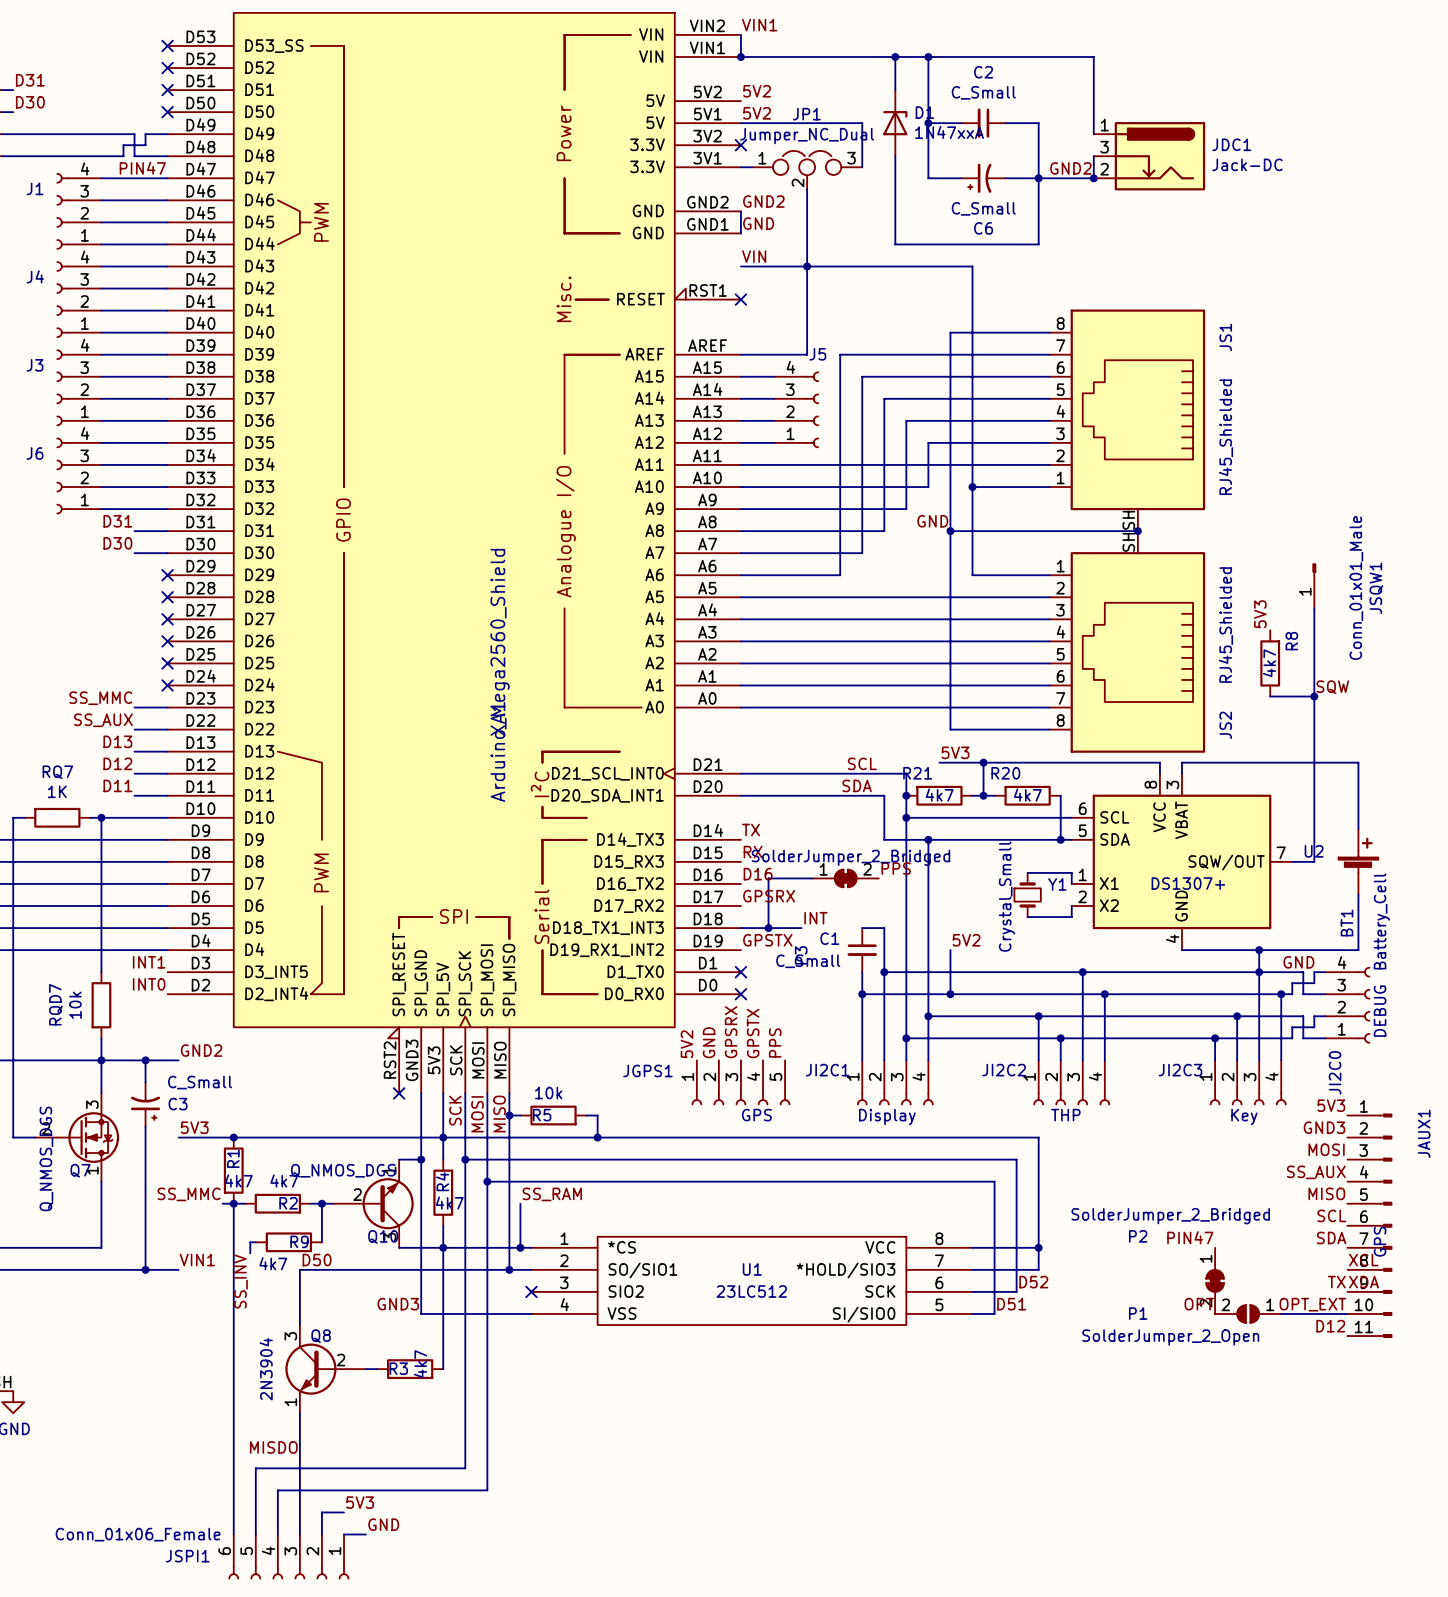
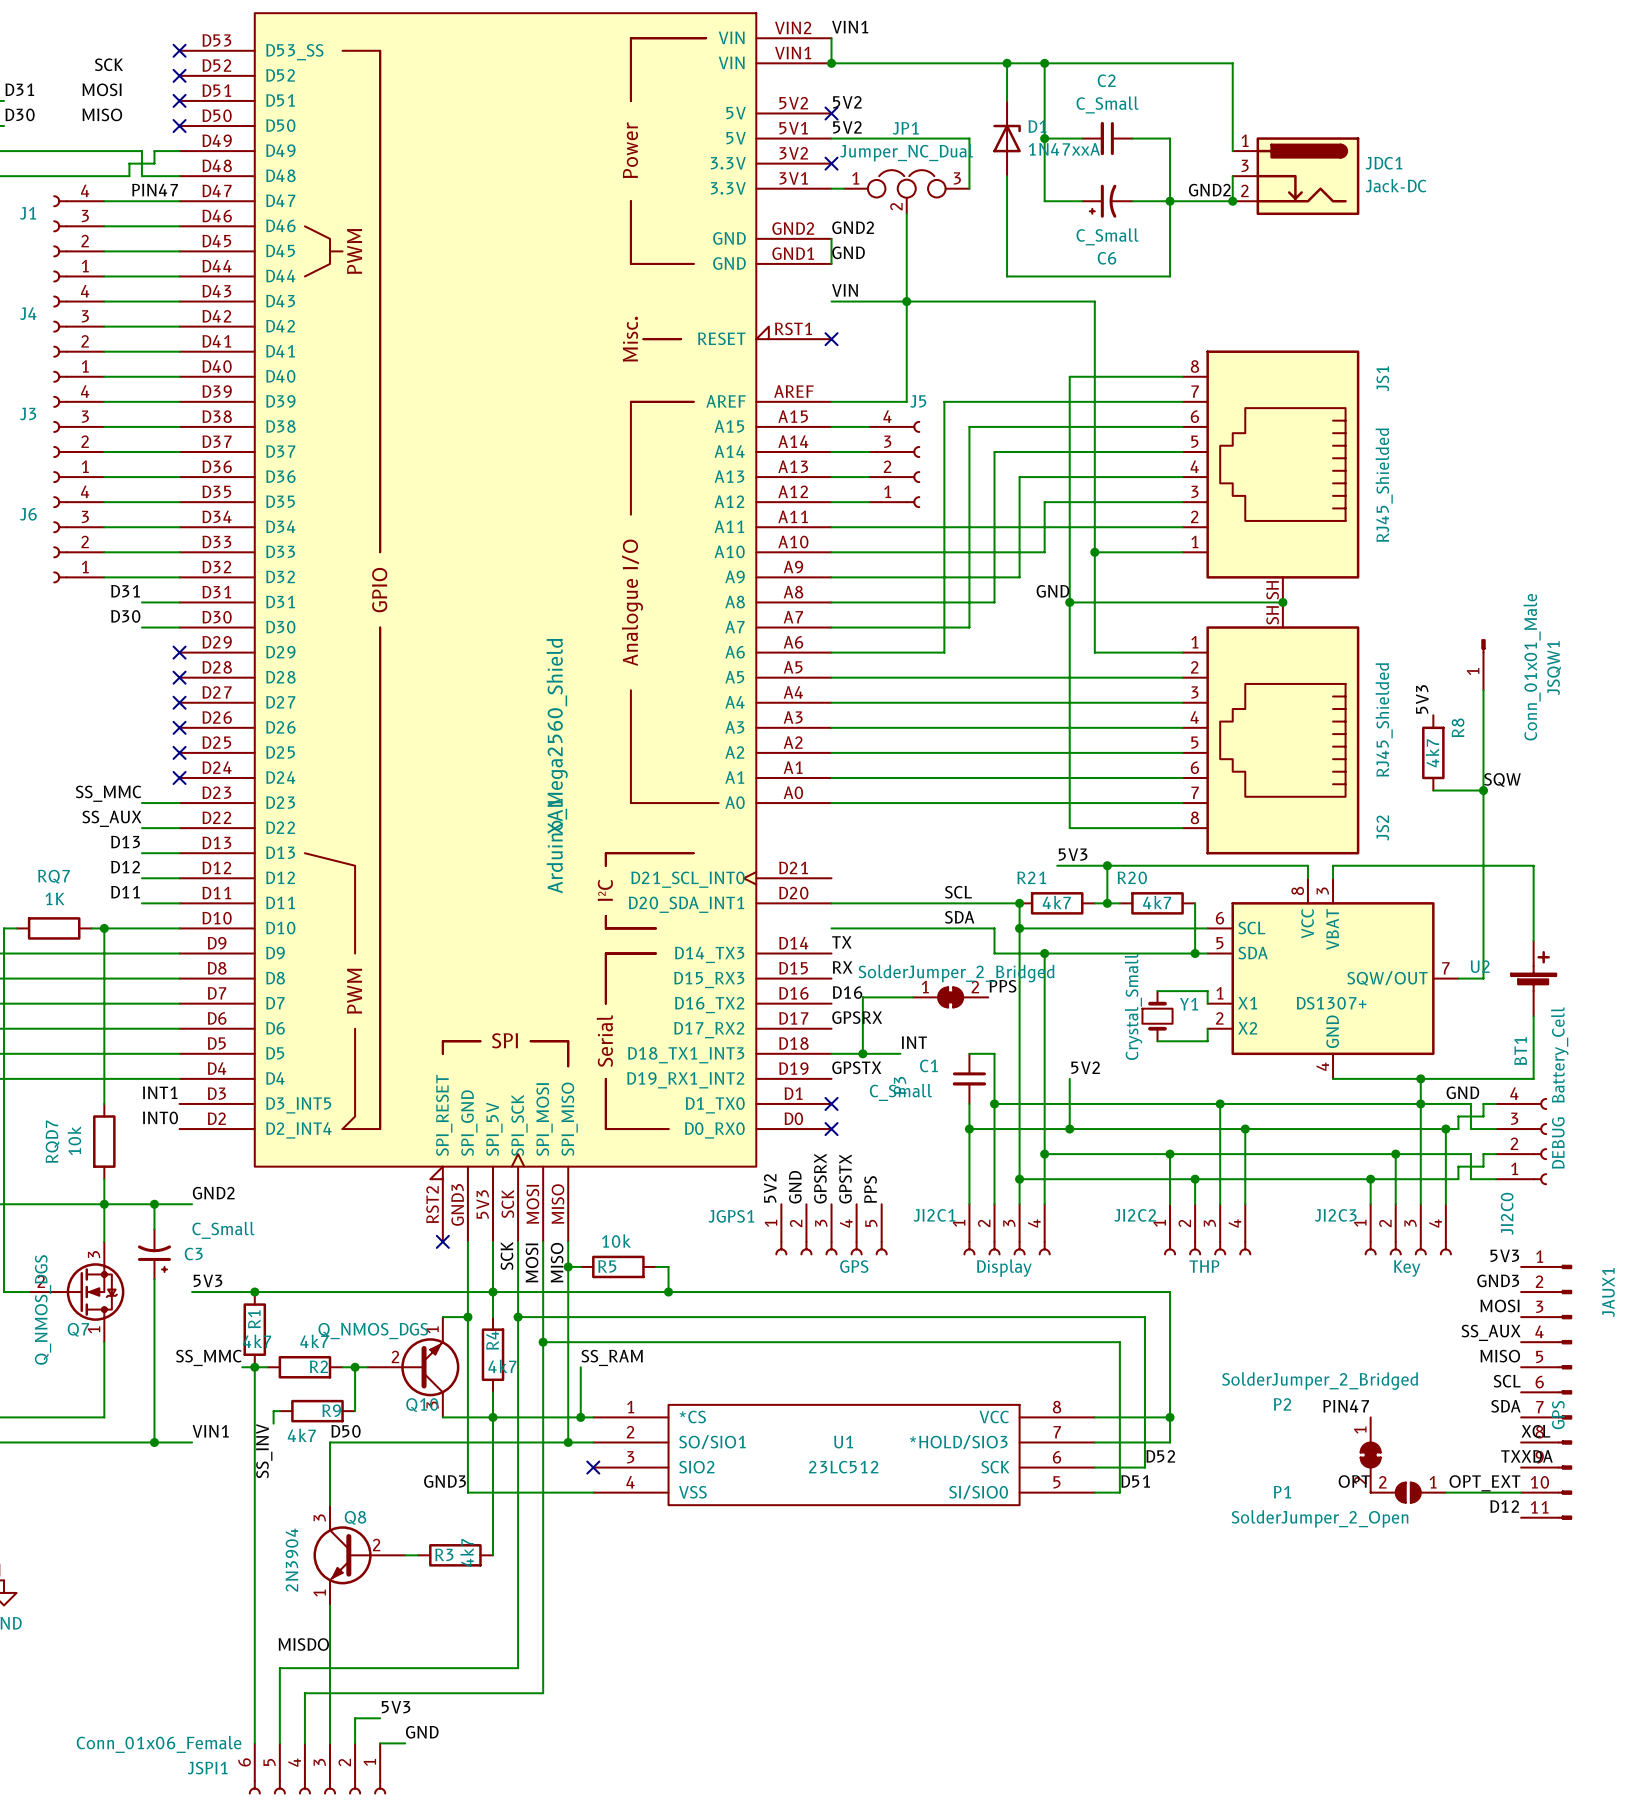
label: none -> SCK (109, 64)
label: none -> MOSI (101, 89)
no-connect mark: none -> (831, 113)
label: none -> MISO (102, 114)
label: SCL (862, 763) -> none
wire: (740, 773) (906, 773) (906, 795) -> none
label: SDA (857, 785) -> SCL (958, 892)
wire: (884, 795) (884, 817) -> (994, 903) (1019, 903)
label: none -> SDA (959, 917)
wire: none -> (831, 928) (994, 928)

